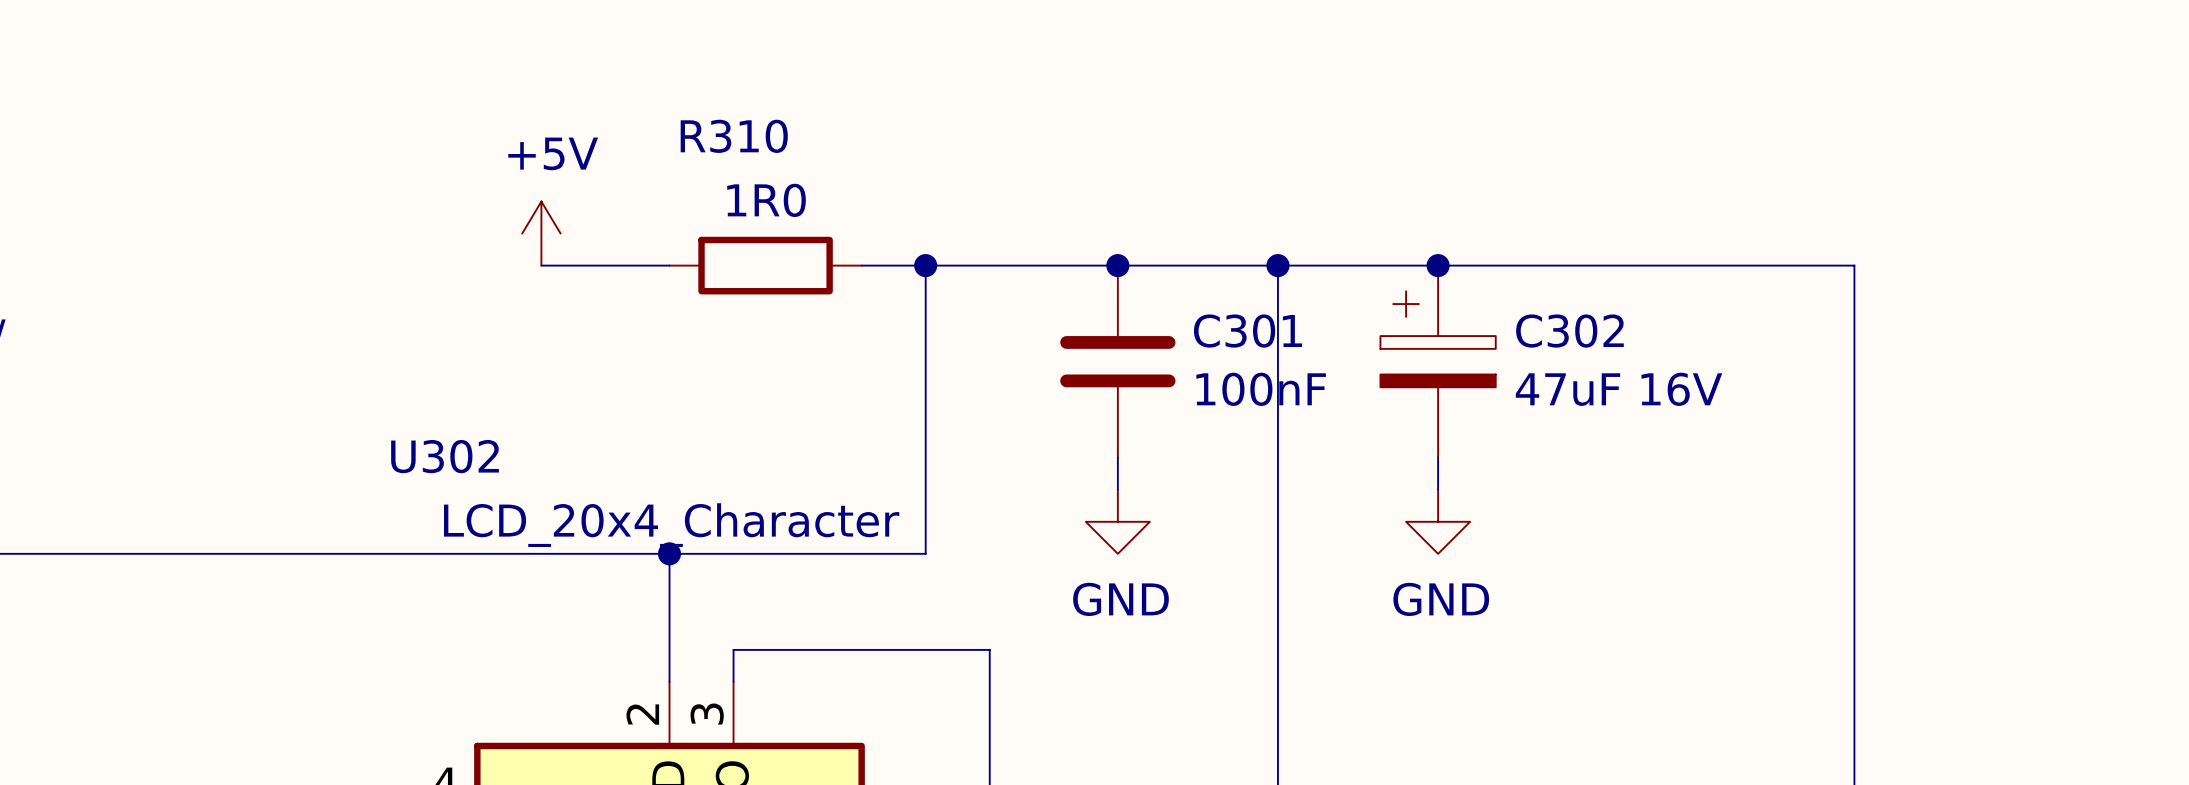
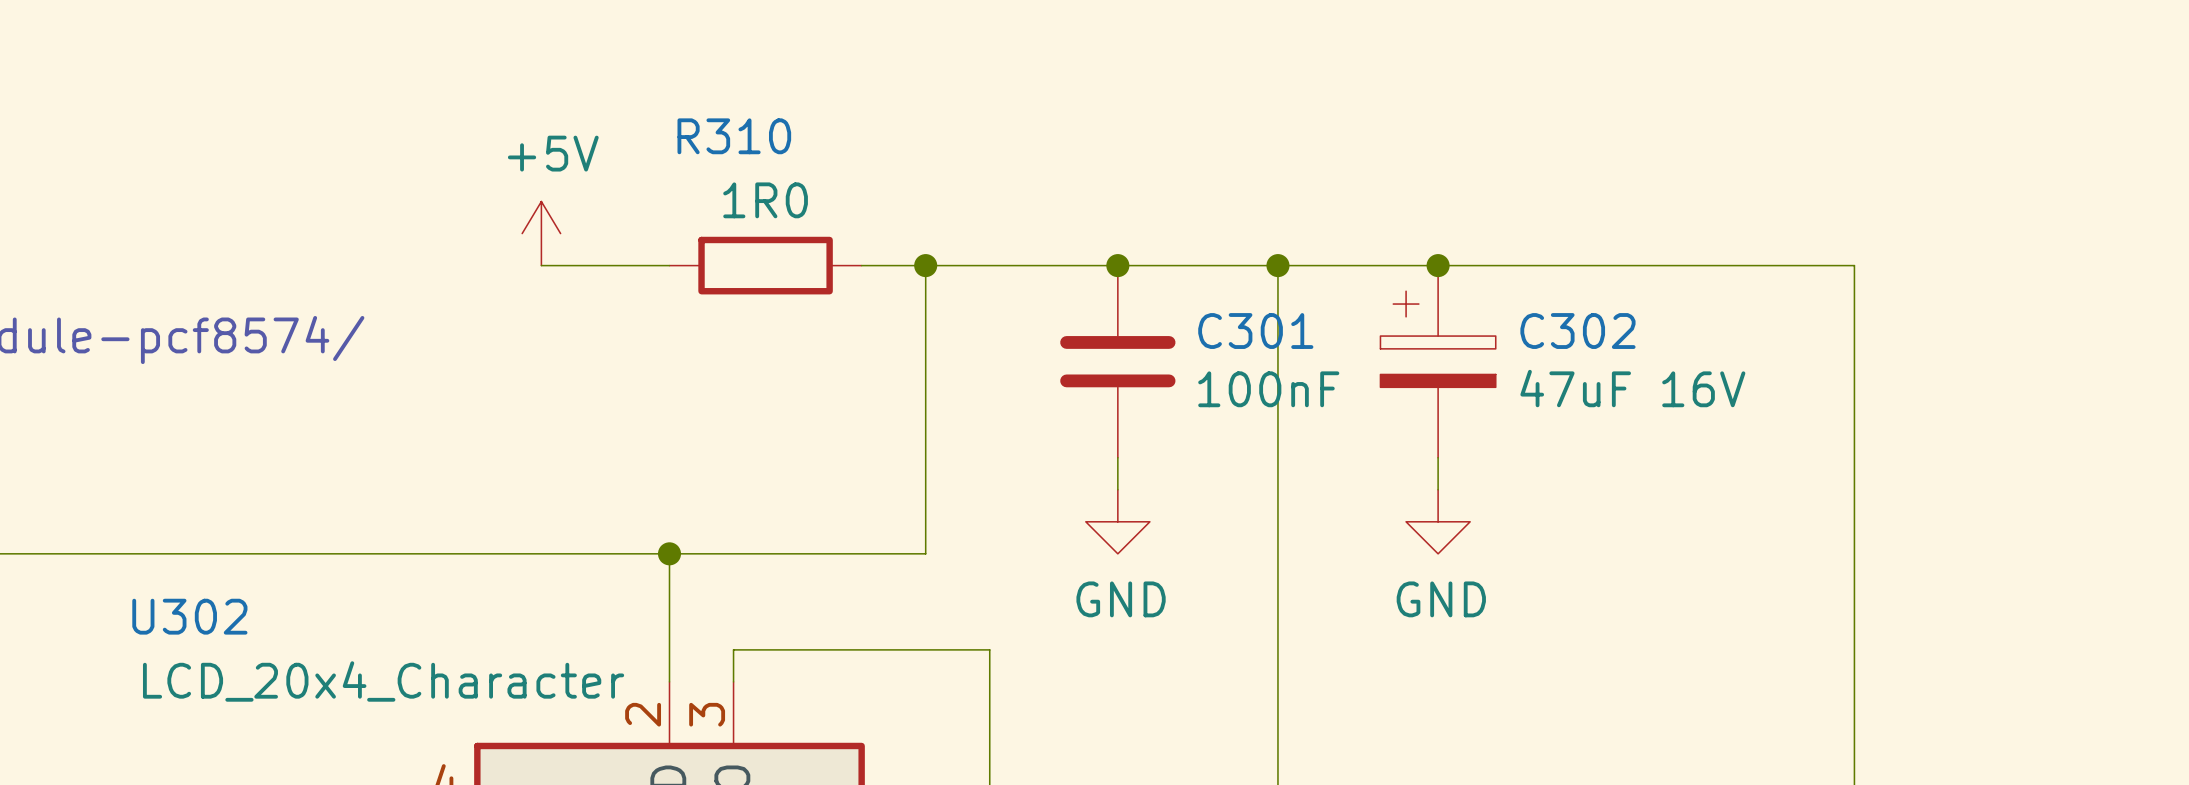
U302 name position: U302 (445, 456) -> U302 (189, 616)
U302 value position: LCD_20x4_Character (671, 525) -> LCD_20x4_Character (383, 681)

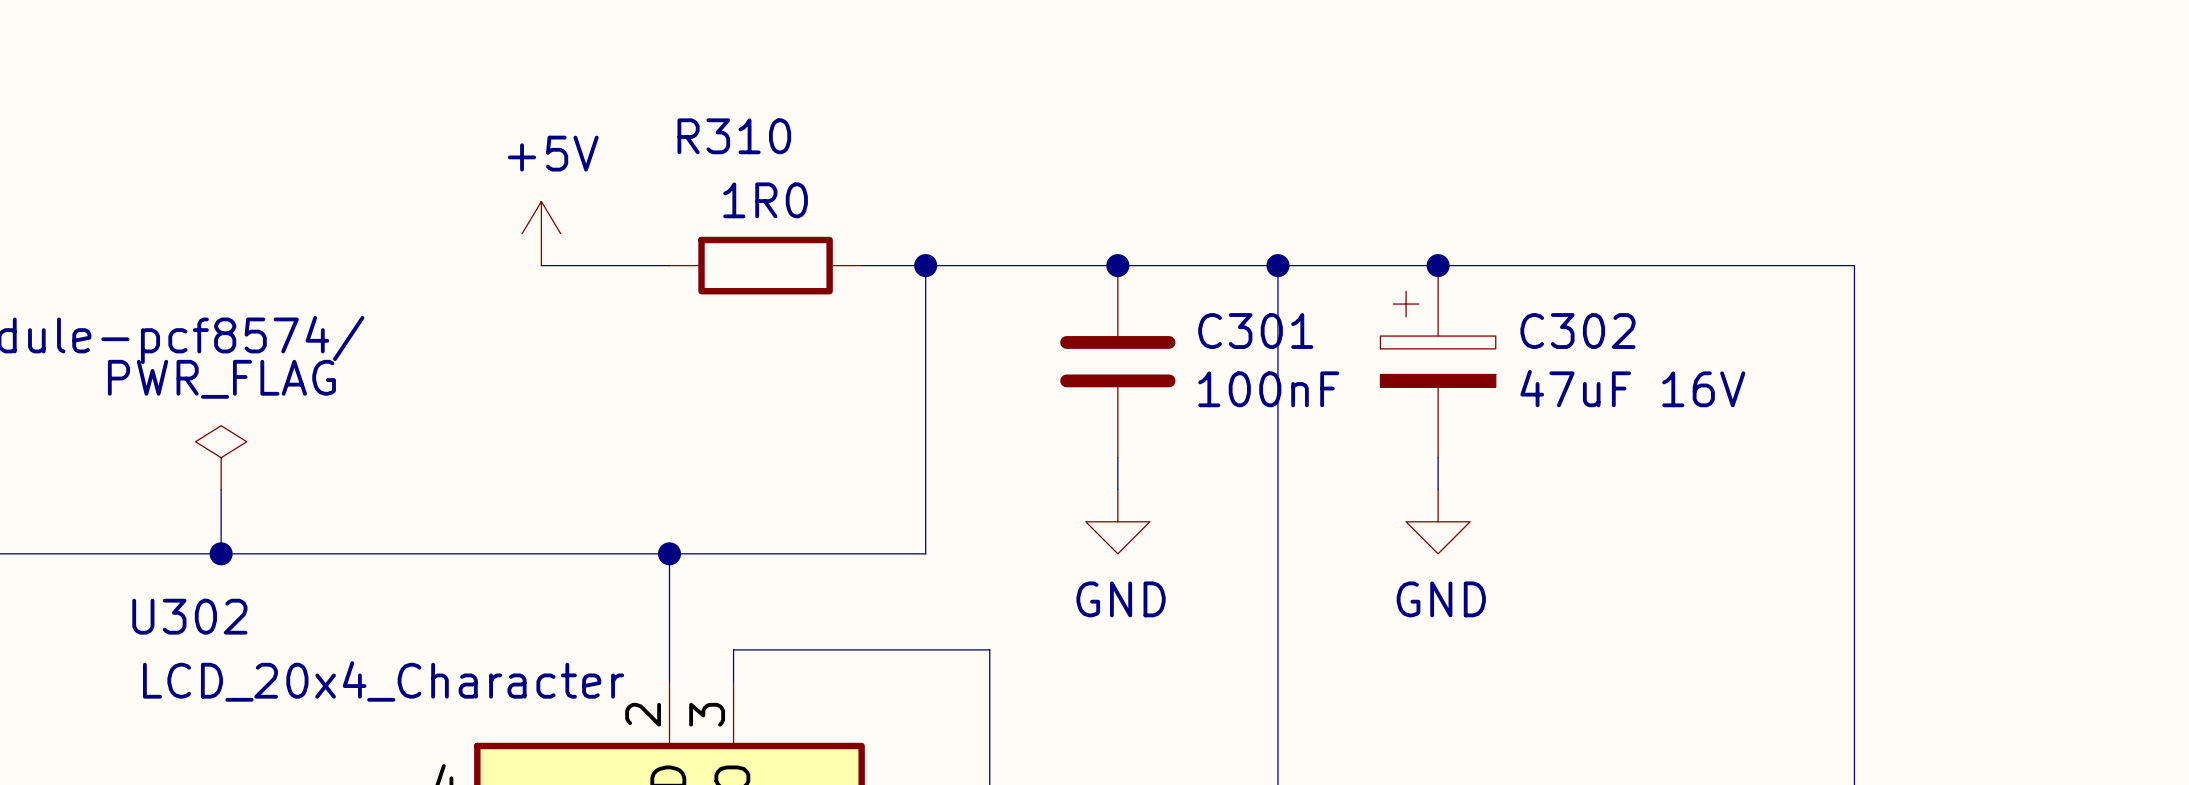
power symbol: none -> PWR_FLAG (221, 457)
wire: none -> (221, 489) (221, 553)
junction: none -> (221, 553)

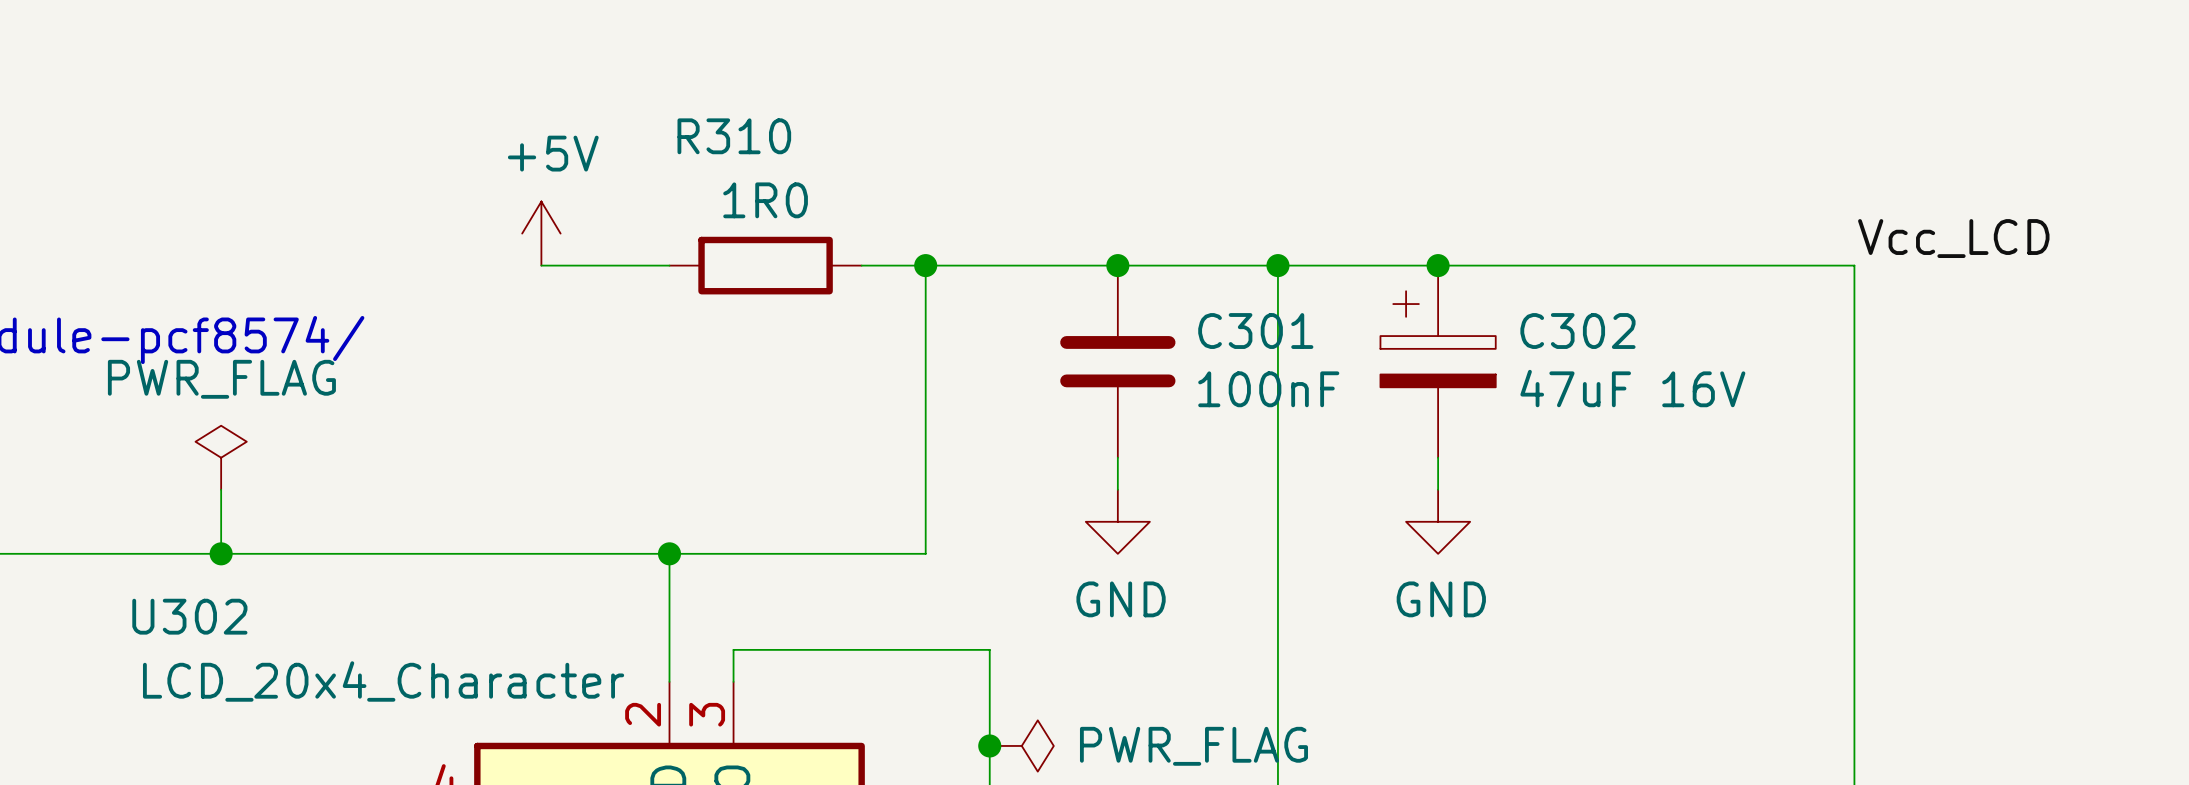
label: none -> Vcc_LCD (1953, 238)
junction: none -> (989, 745)
power symbol: none -> PWR_FLAG (1021, 745)

